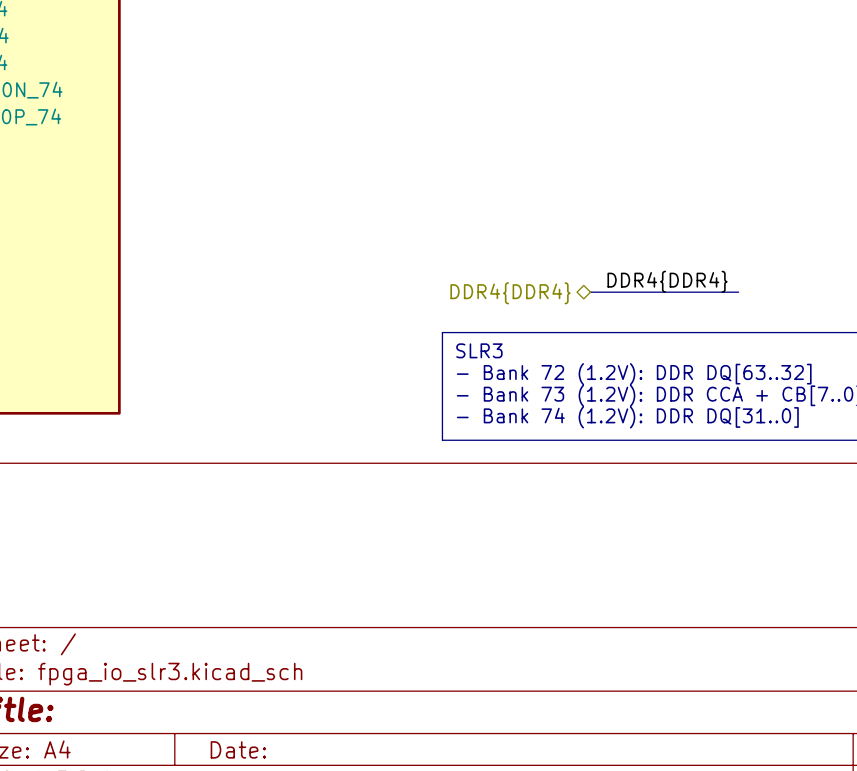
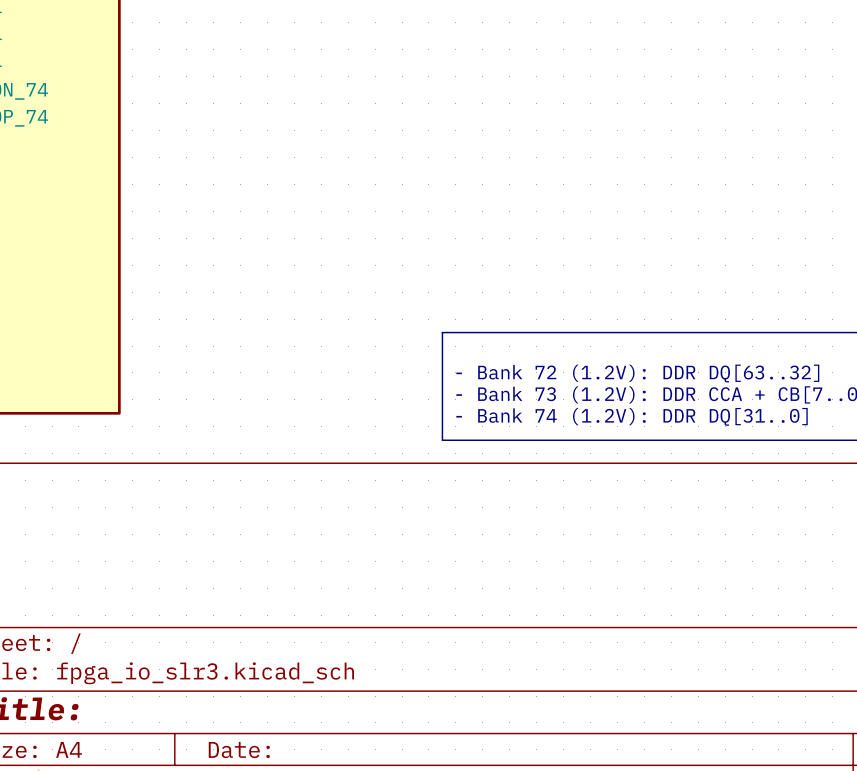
label: DDR4{DDR4} (667, 281) -> none
bus: (590, 292) (738, 292) -> none
hierarchical label: DDR4{DDR4} (510, 293) -> none
text: SLR3 (479, 350) -> none

